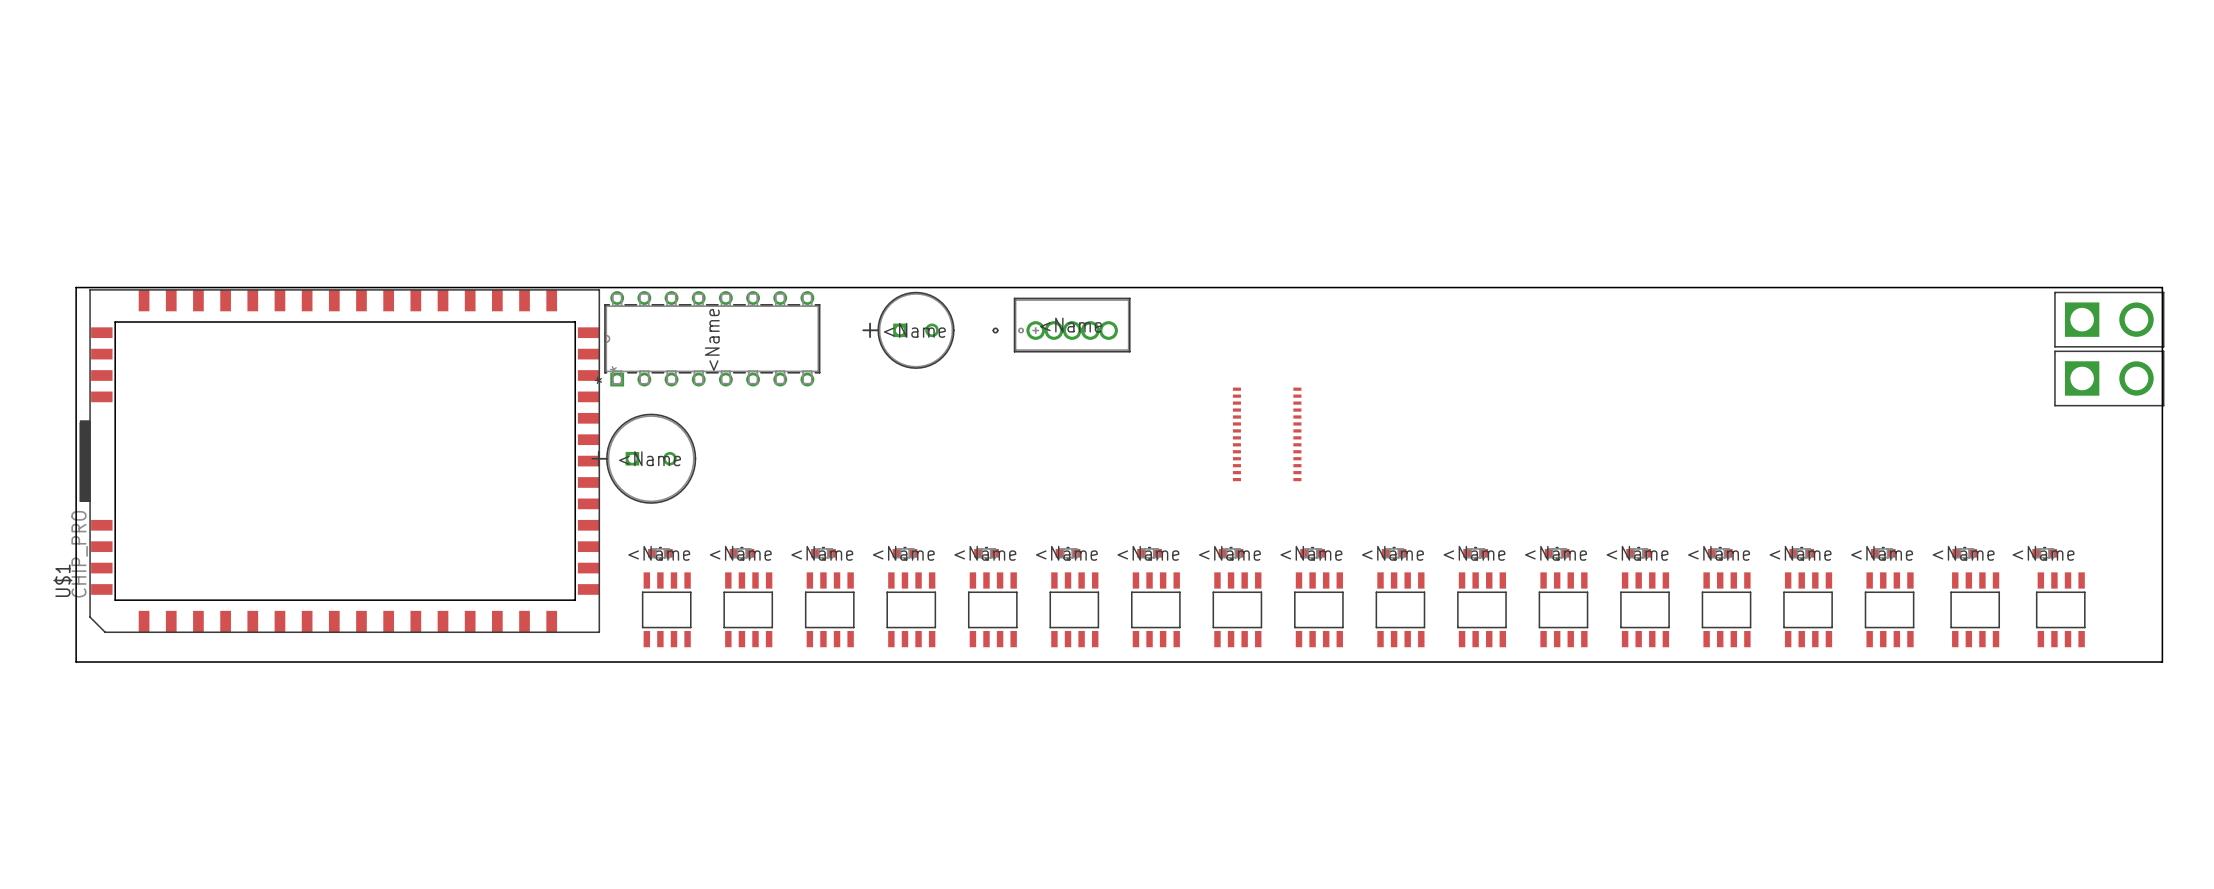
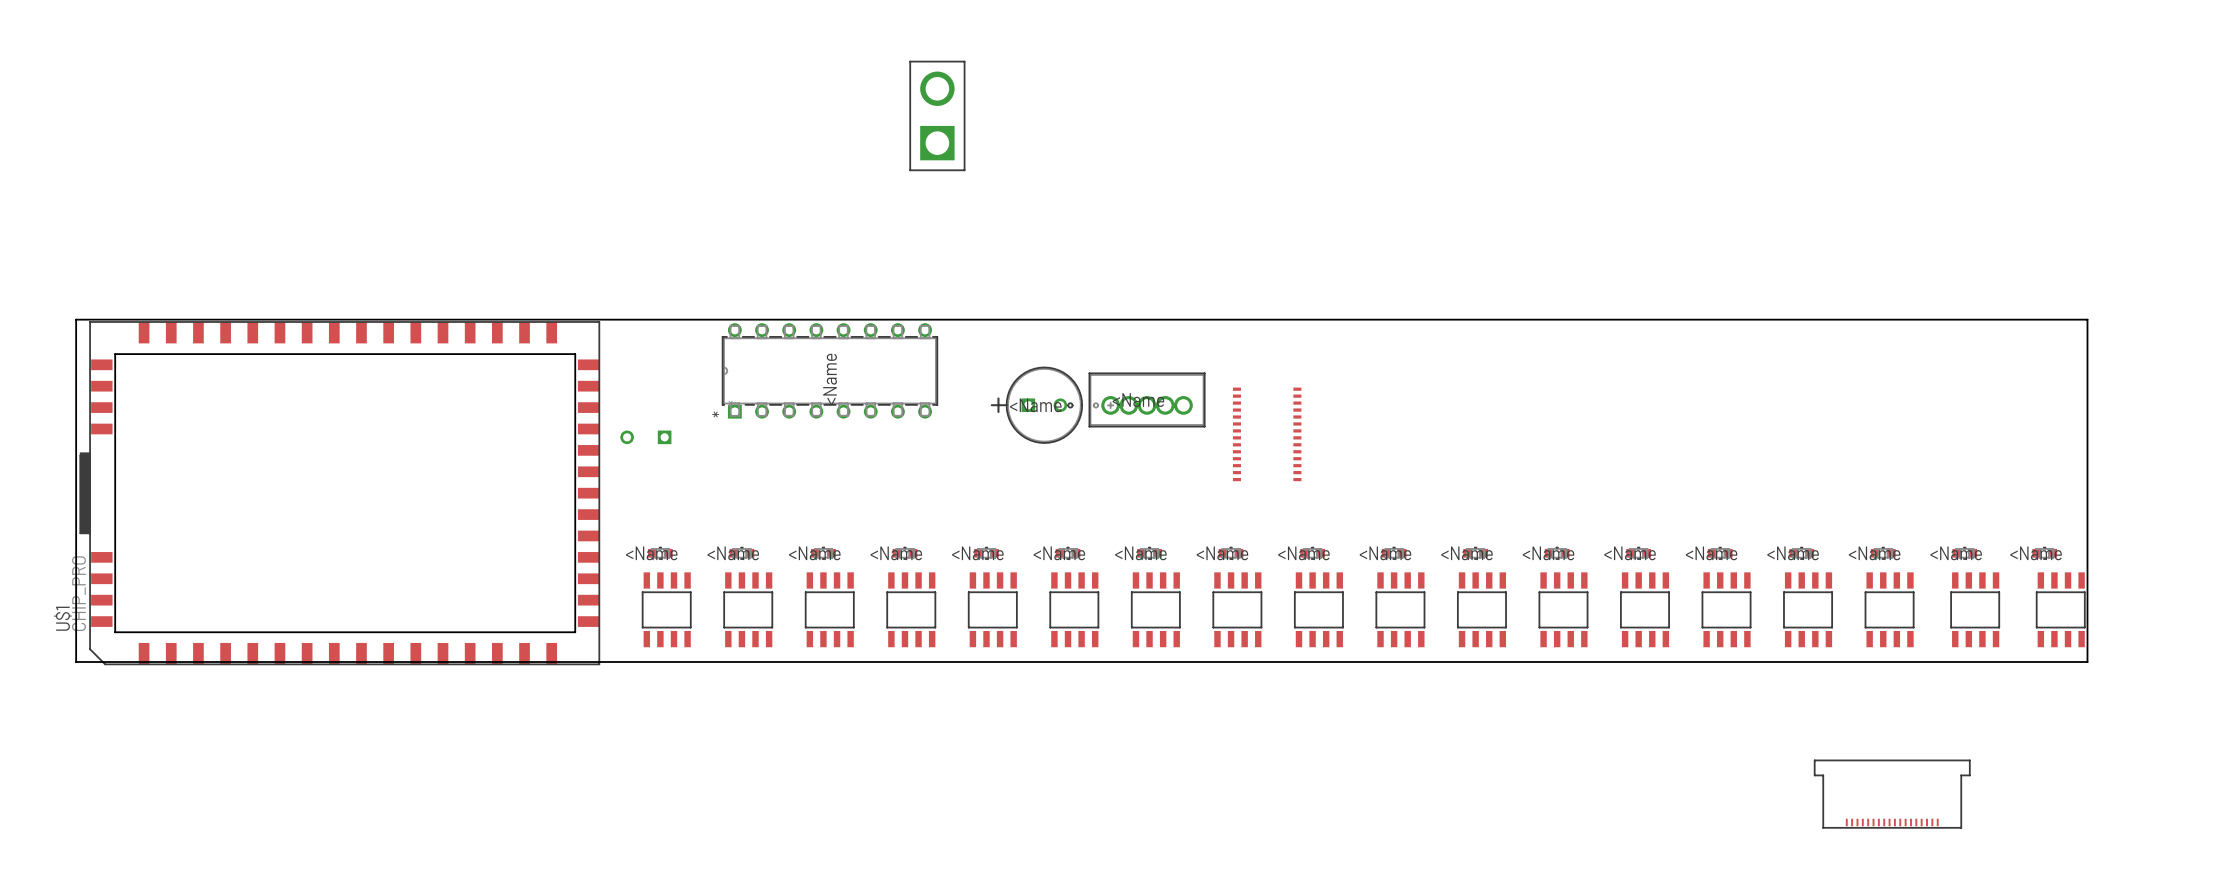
part: none -> (937, 115)
board edge: (76, 319) (76, 287) (2162, 287) (2162, 662) (2087, 662) -> (76, 319) (2087, 319) (2087, 662)
part: (2109, 319) -> none
part position: (1061, 325) -> (1136, 399)
part position: (908, 330) -> (1036, 405)
part position: (712, 338) -> (829, 370)
part: (2109, 378) -> none
part side: top (643, 458) -> bottom (645, 437)
U$1 position: (339, 461) -> (339, 493)
part: none -> (1892, 794)

